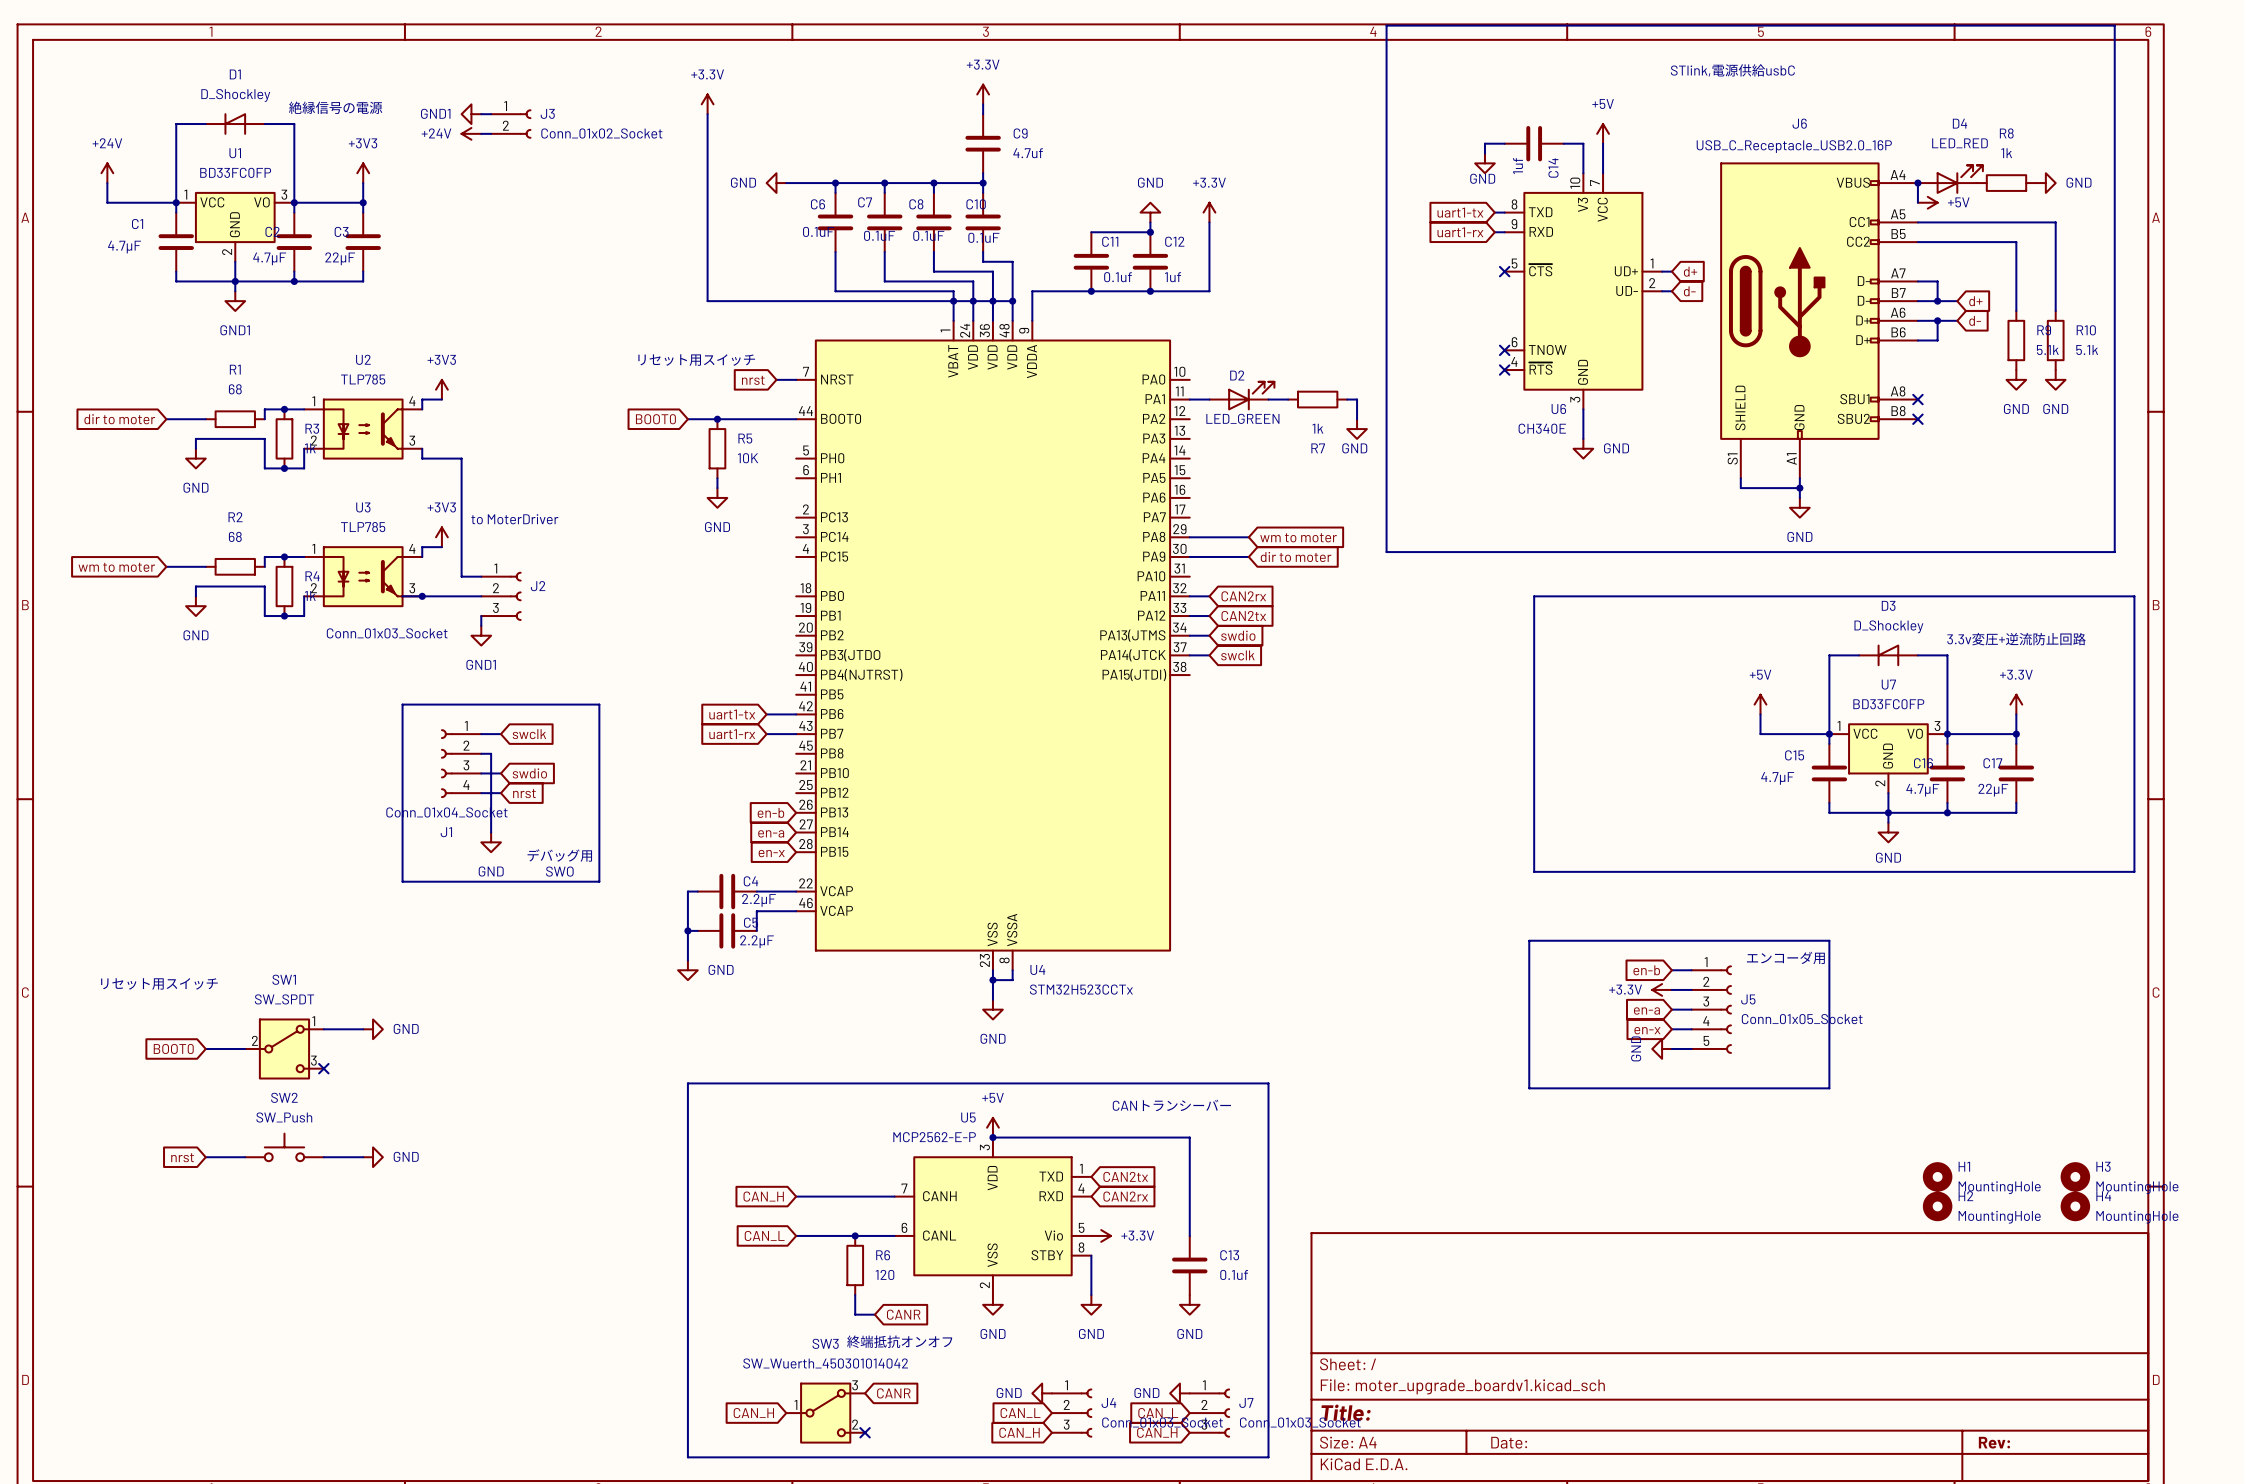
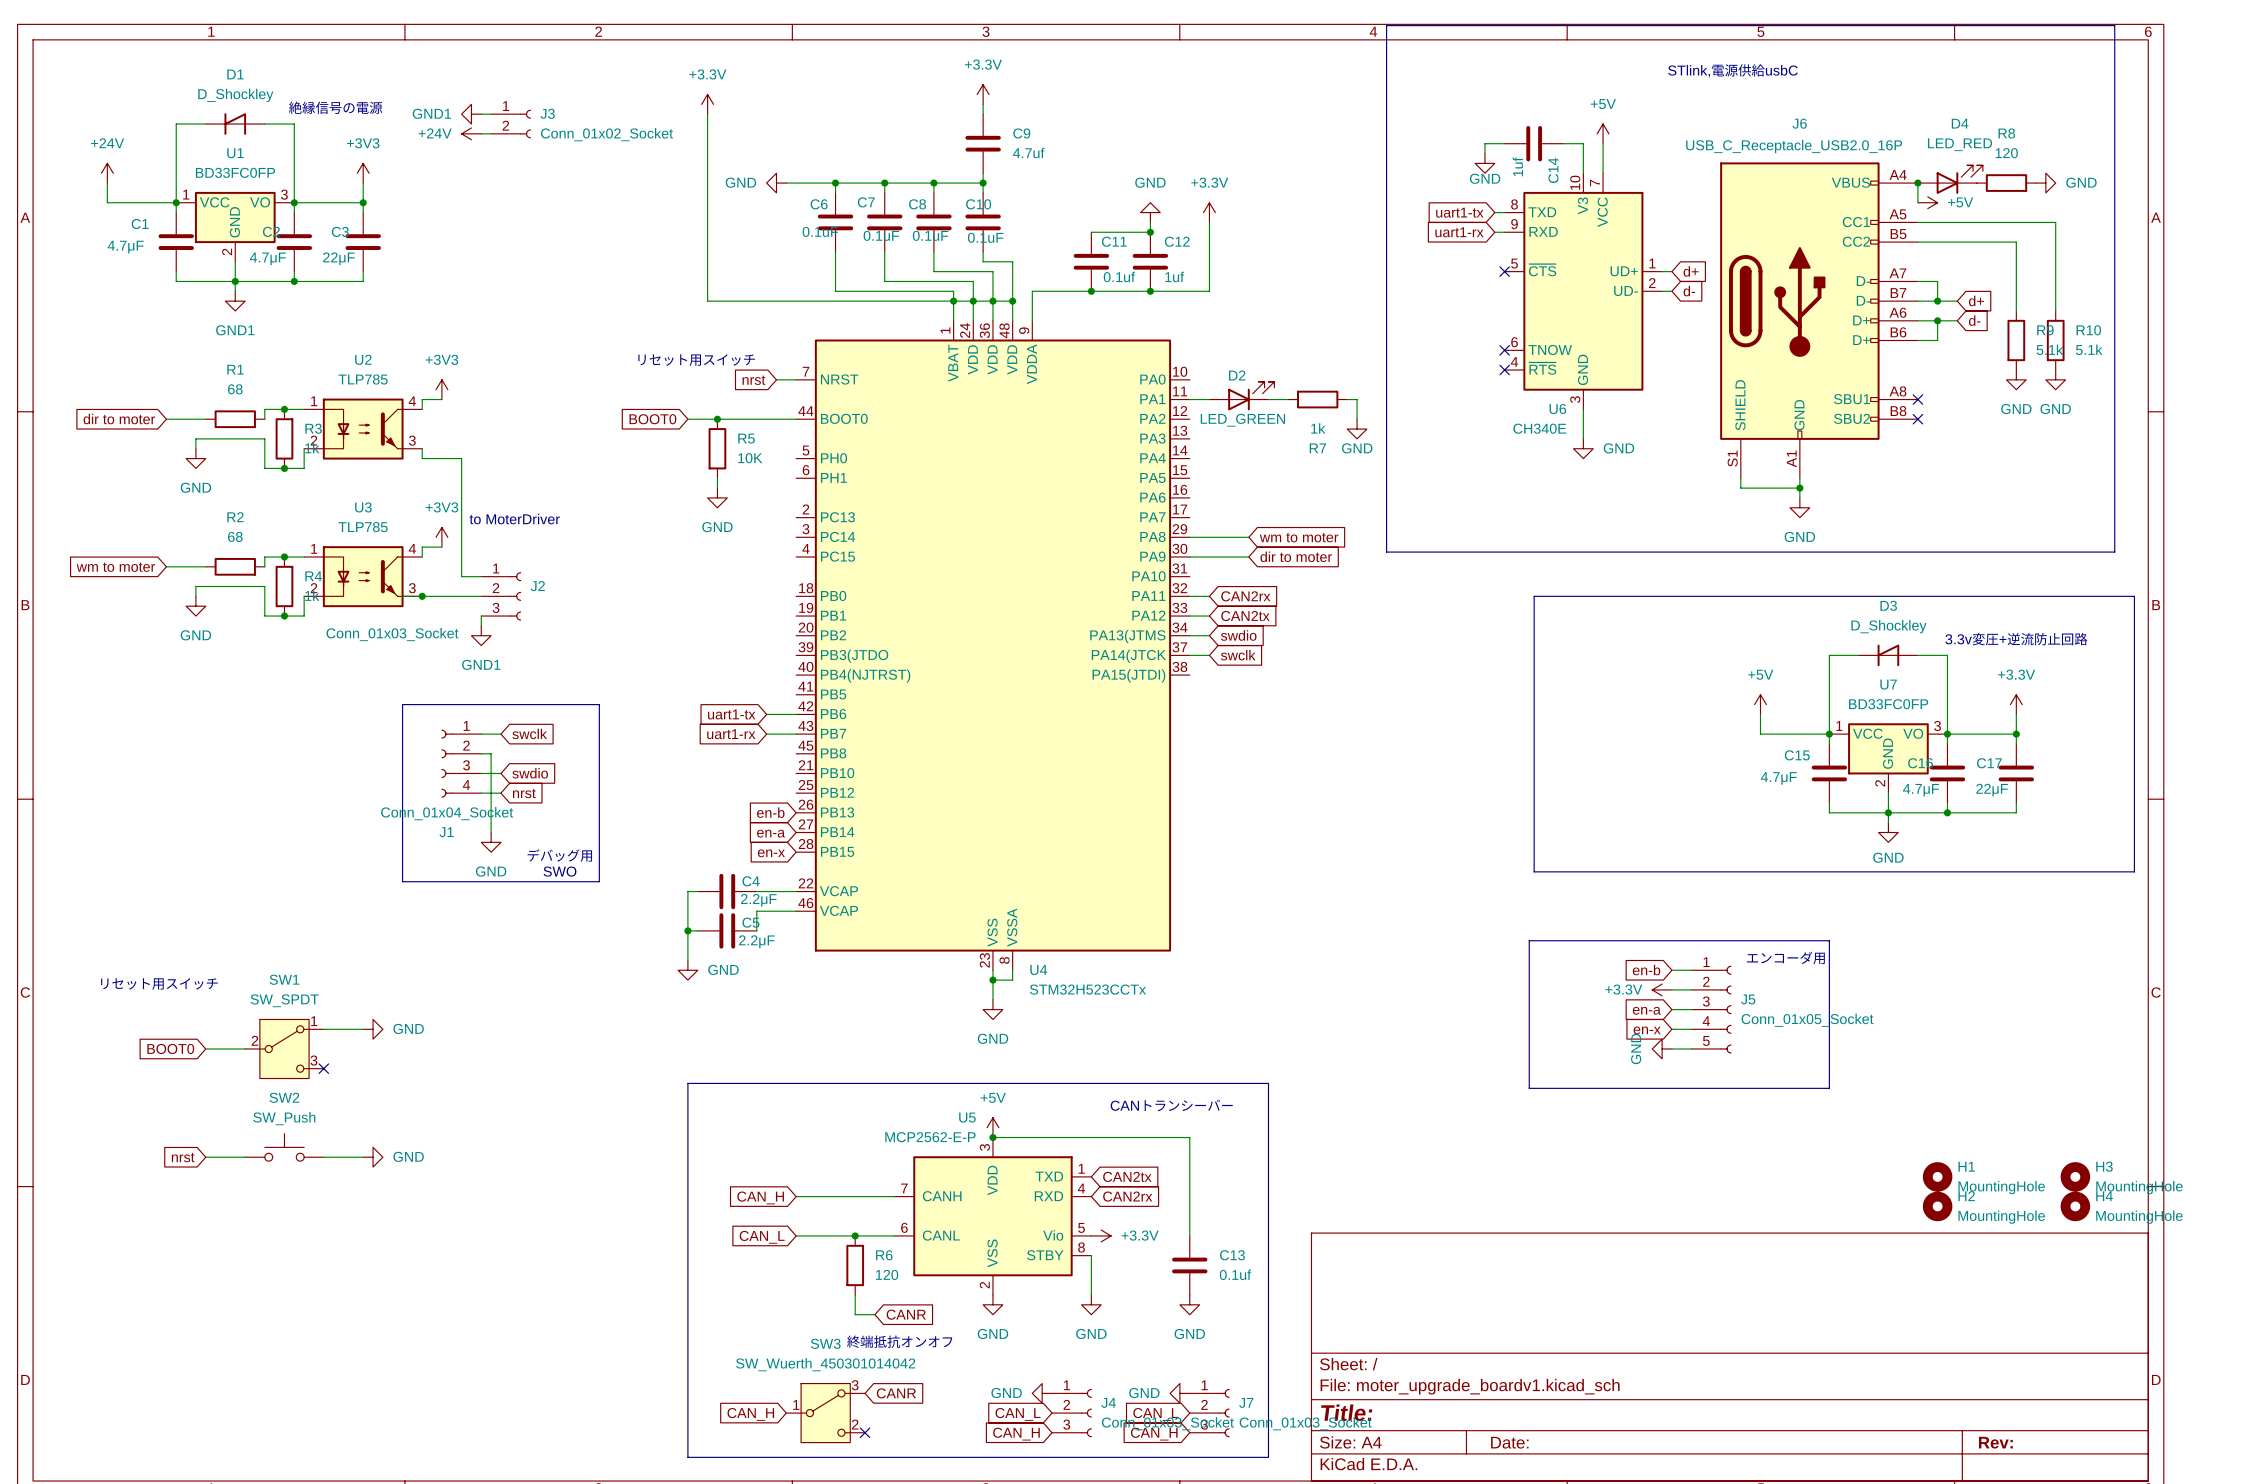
R8 value: 1k (2006, 153) -> 120 (2006, 153)

